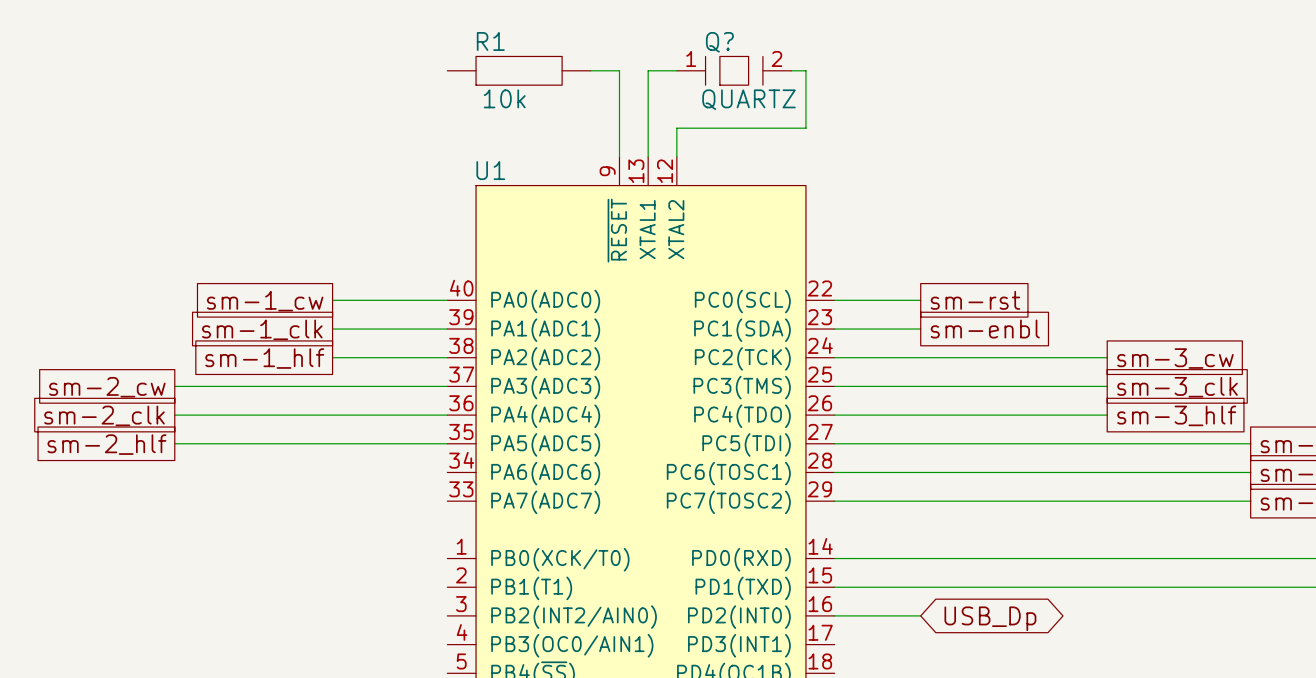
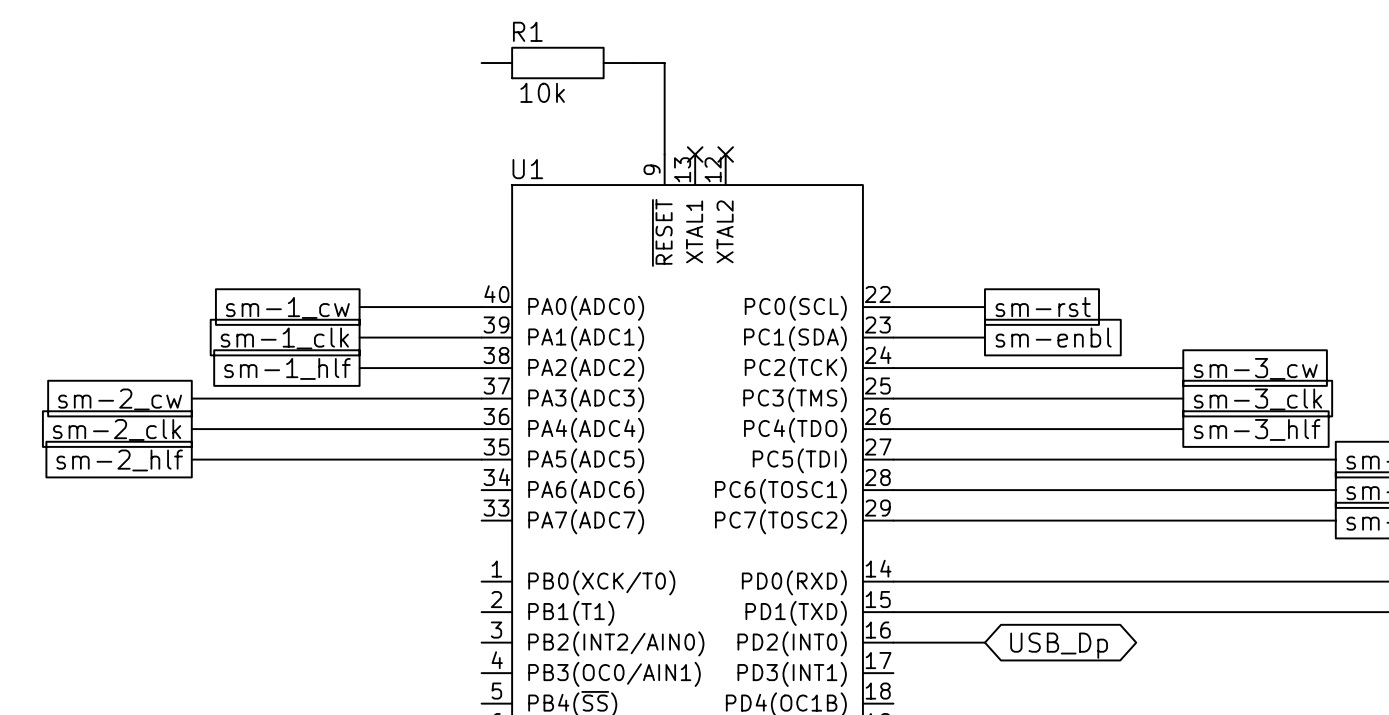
wire: (676, 70) (648, 70) (648, 156) -> none
Q?: QUARTZ (734, 70) -> none
wire: (791, 70) (805, 70) (805, 128) (676, 128) (676, 156) -> none
no-connect mark: none -> (695, 154)
no-connect mark: none -> (725, 154)

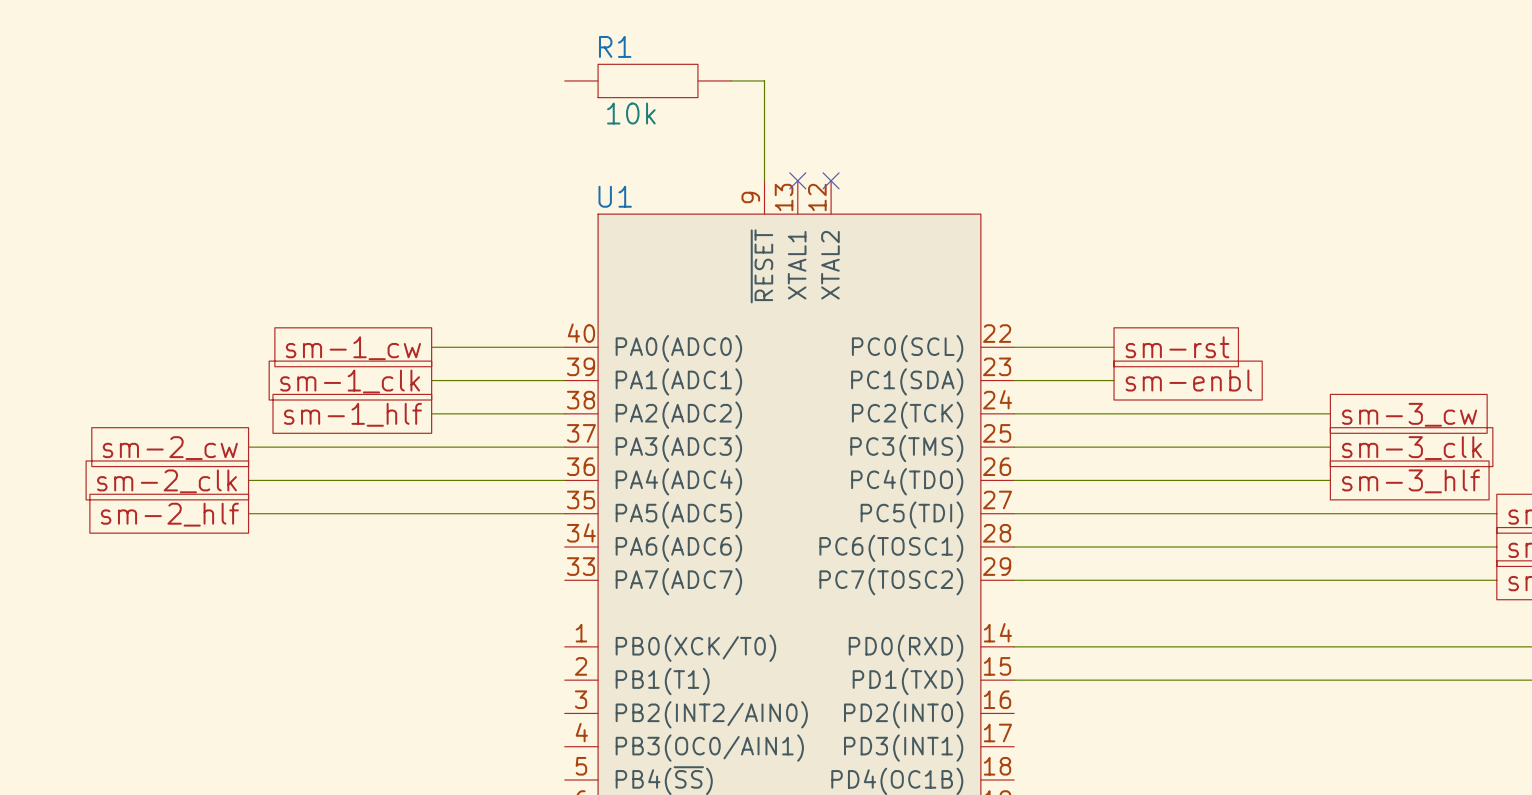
wire: (893, 642) (984, 642) -> none
global label: USB_Dp (1059, 645) -> none

